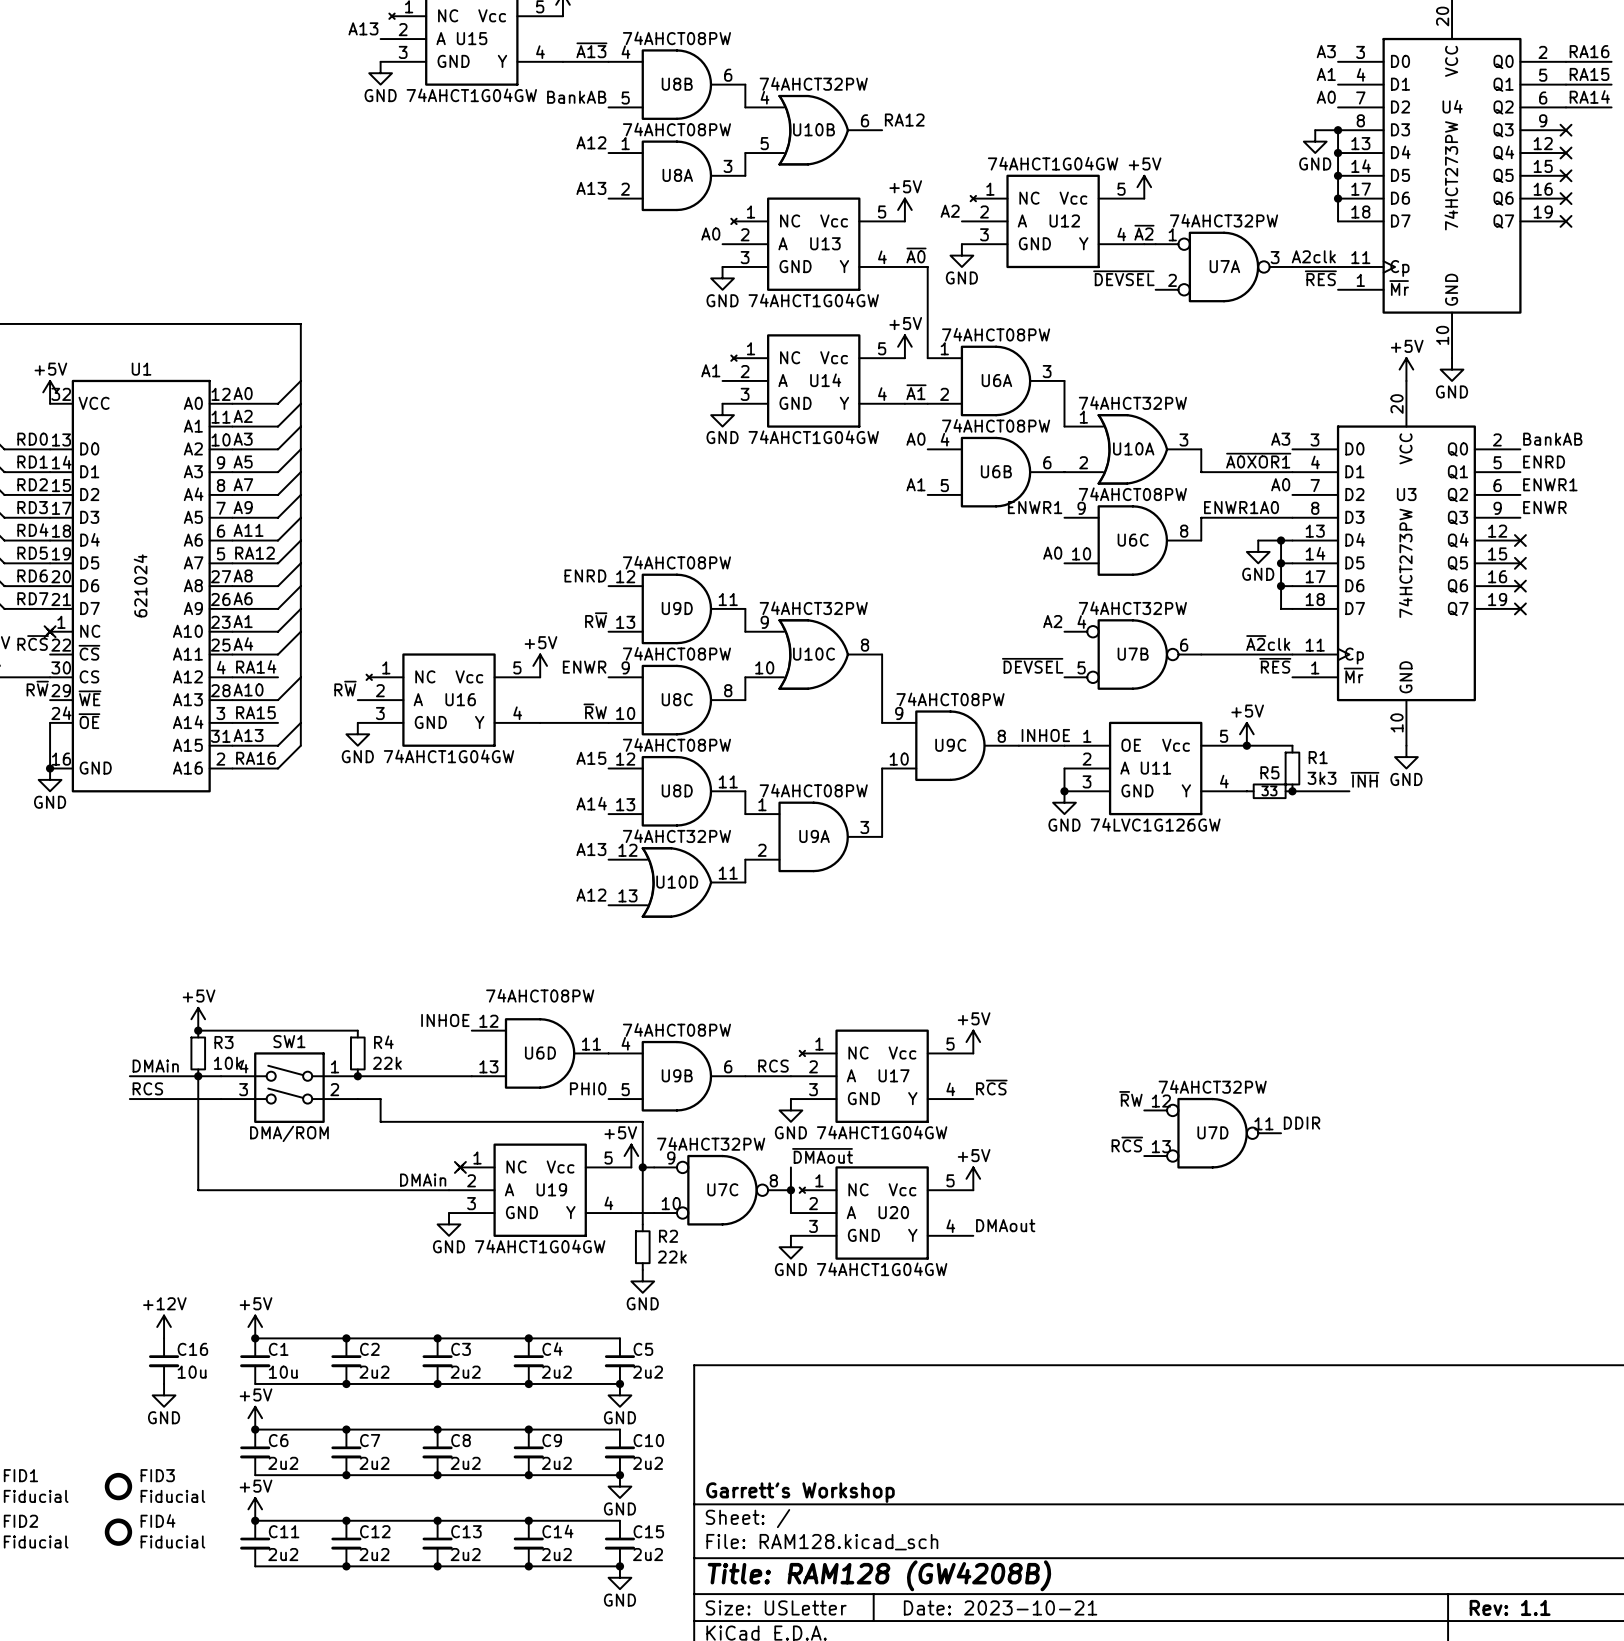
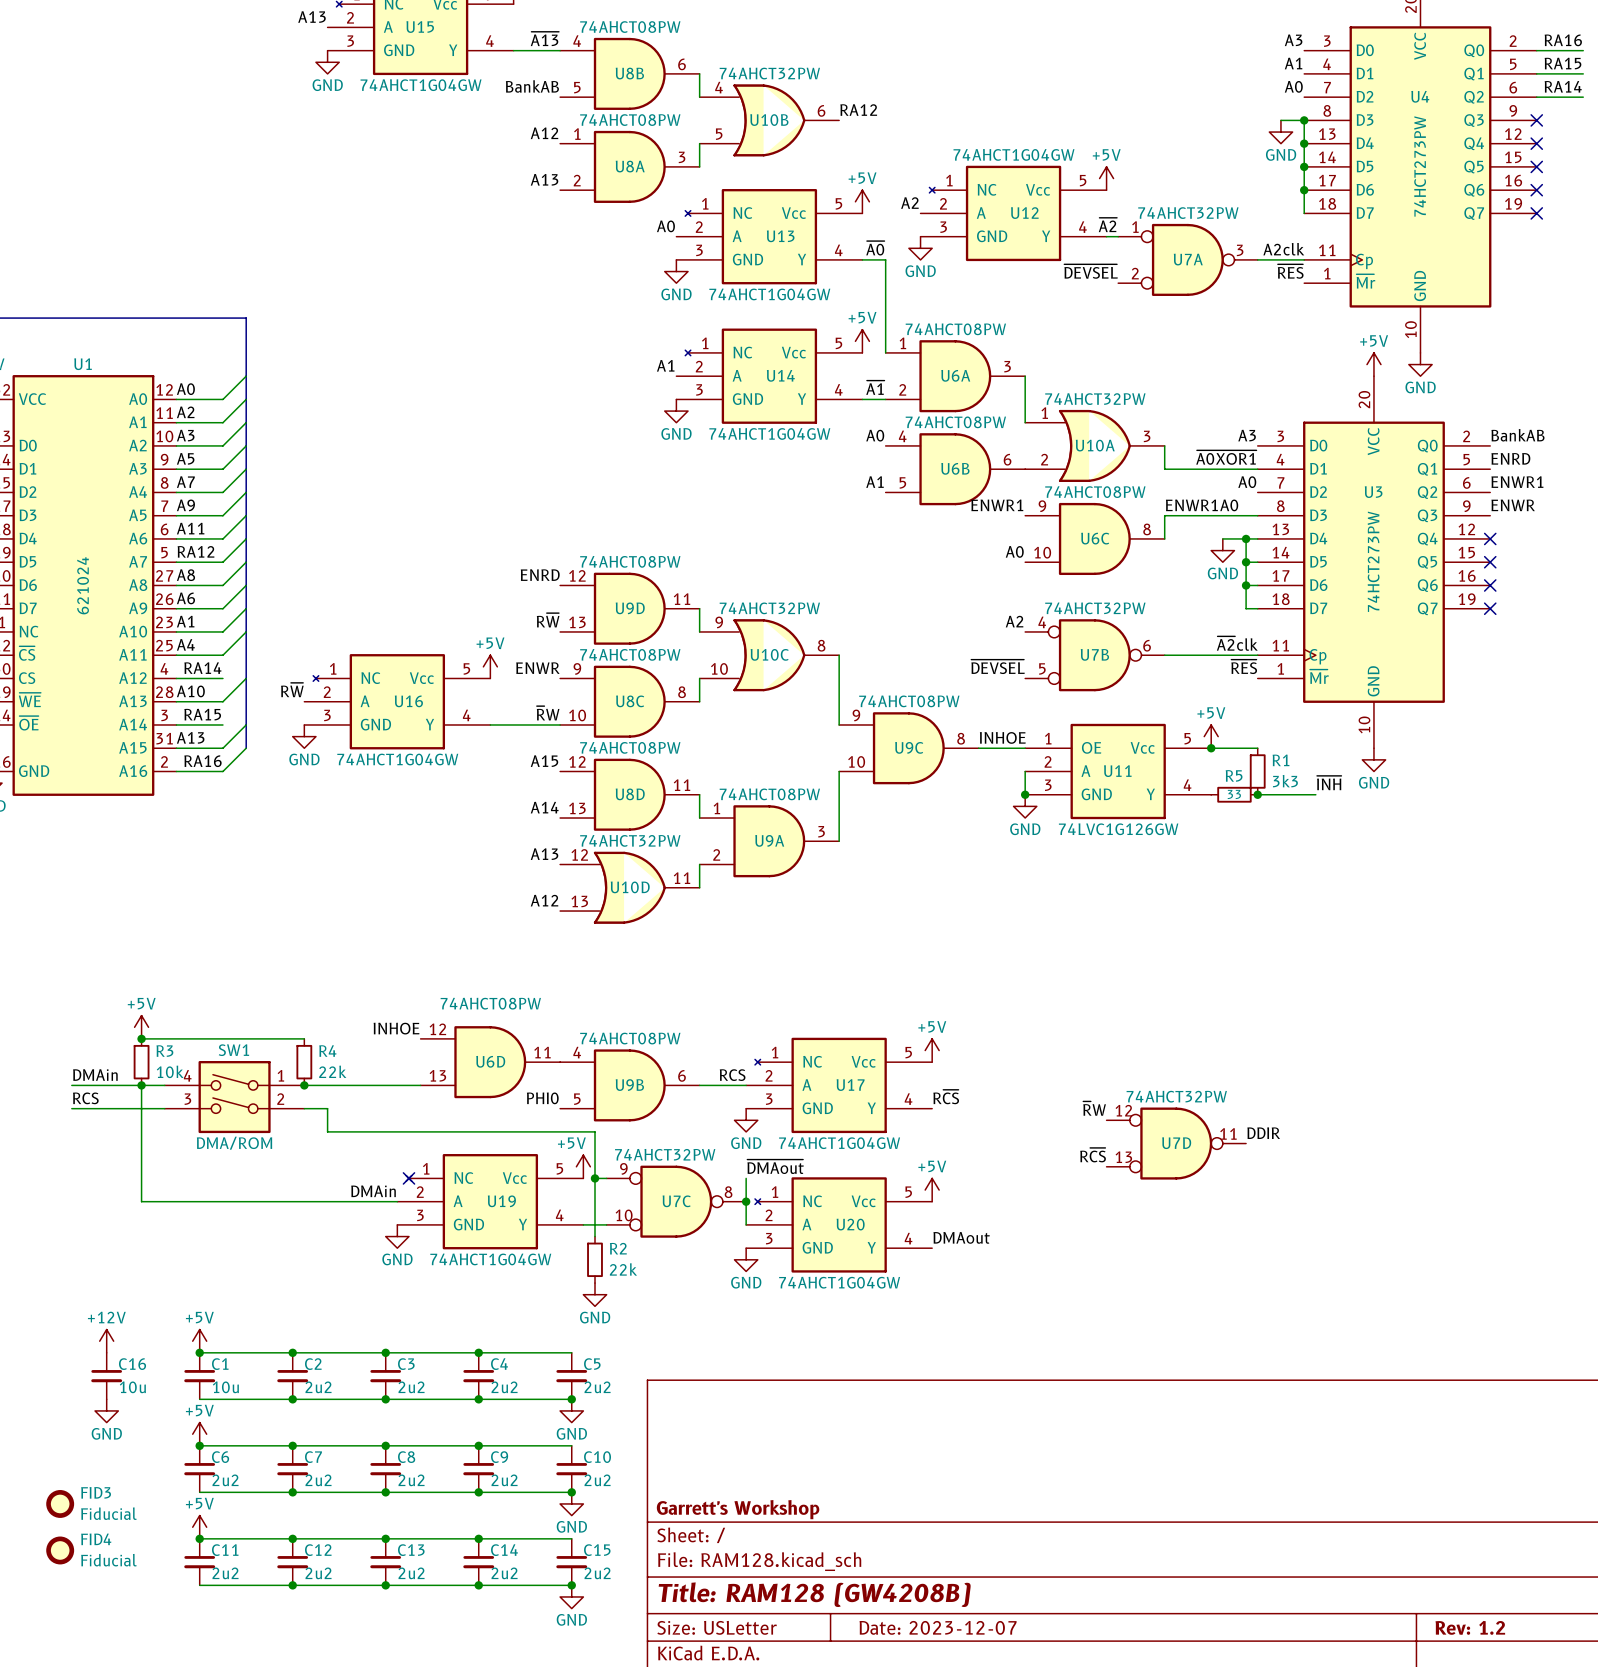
title block: Date: 2023-10-21 (1000, 1607) -> Date: 2023-12-07 (938, 1627)
title block: Rev: 1.1 (1510, 1607) -> Rev: 1.2 (1470, 1627)

